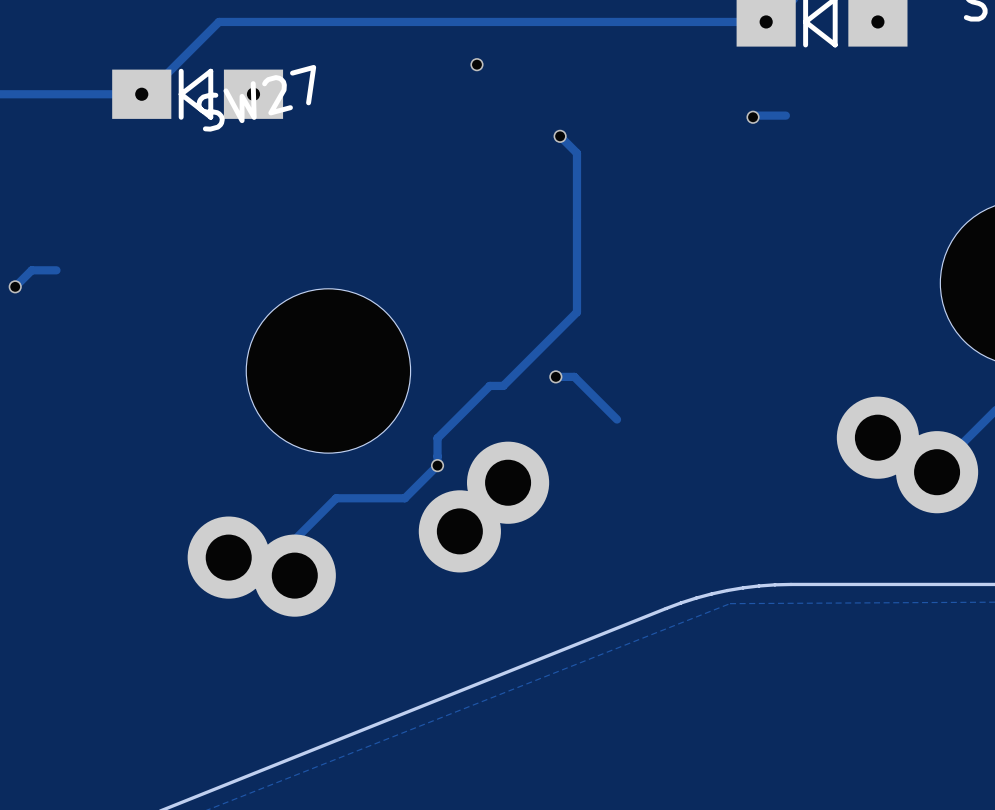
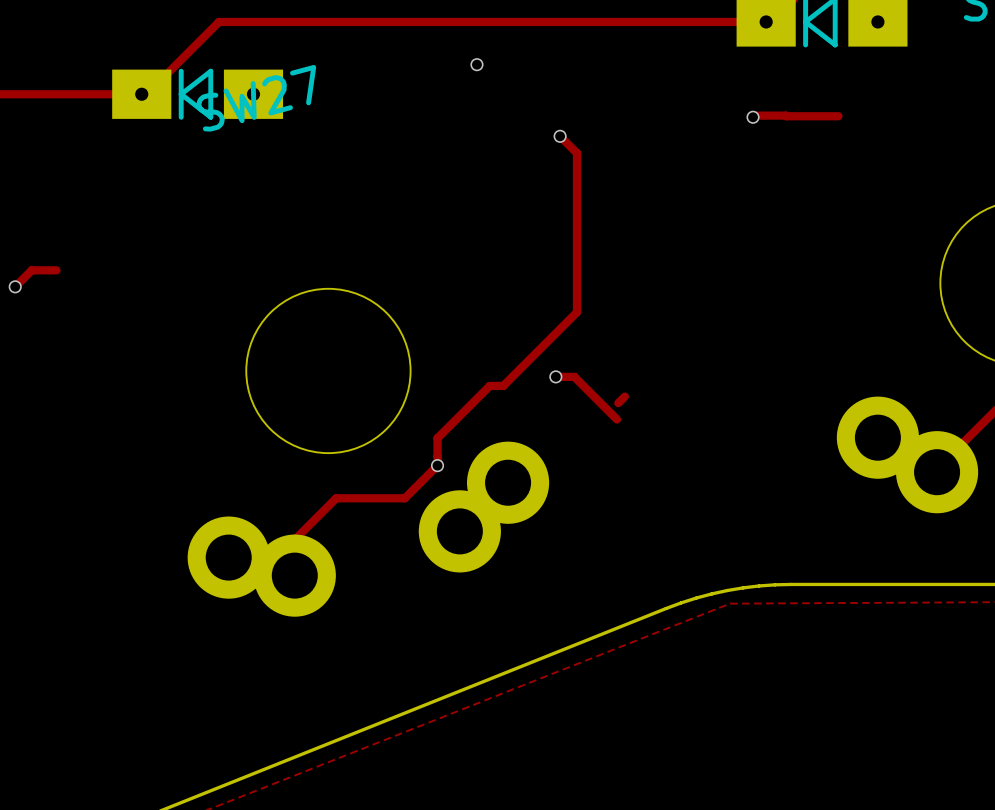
track: none -> (785, 115) (838, 116)
track: none -> (624, 396) (618, 403)

